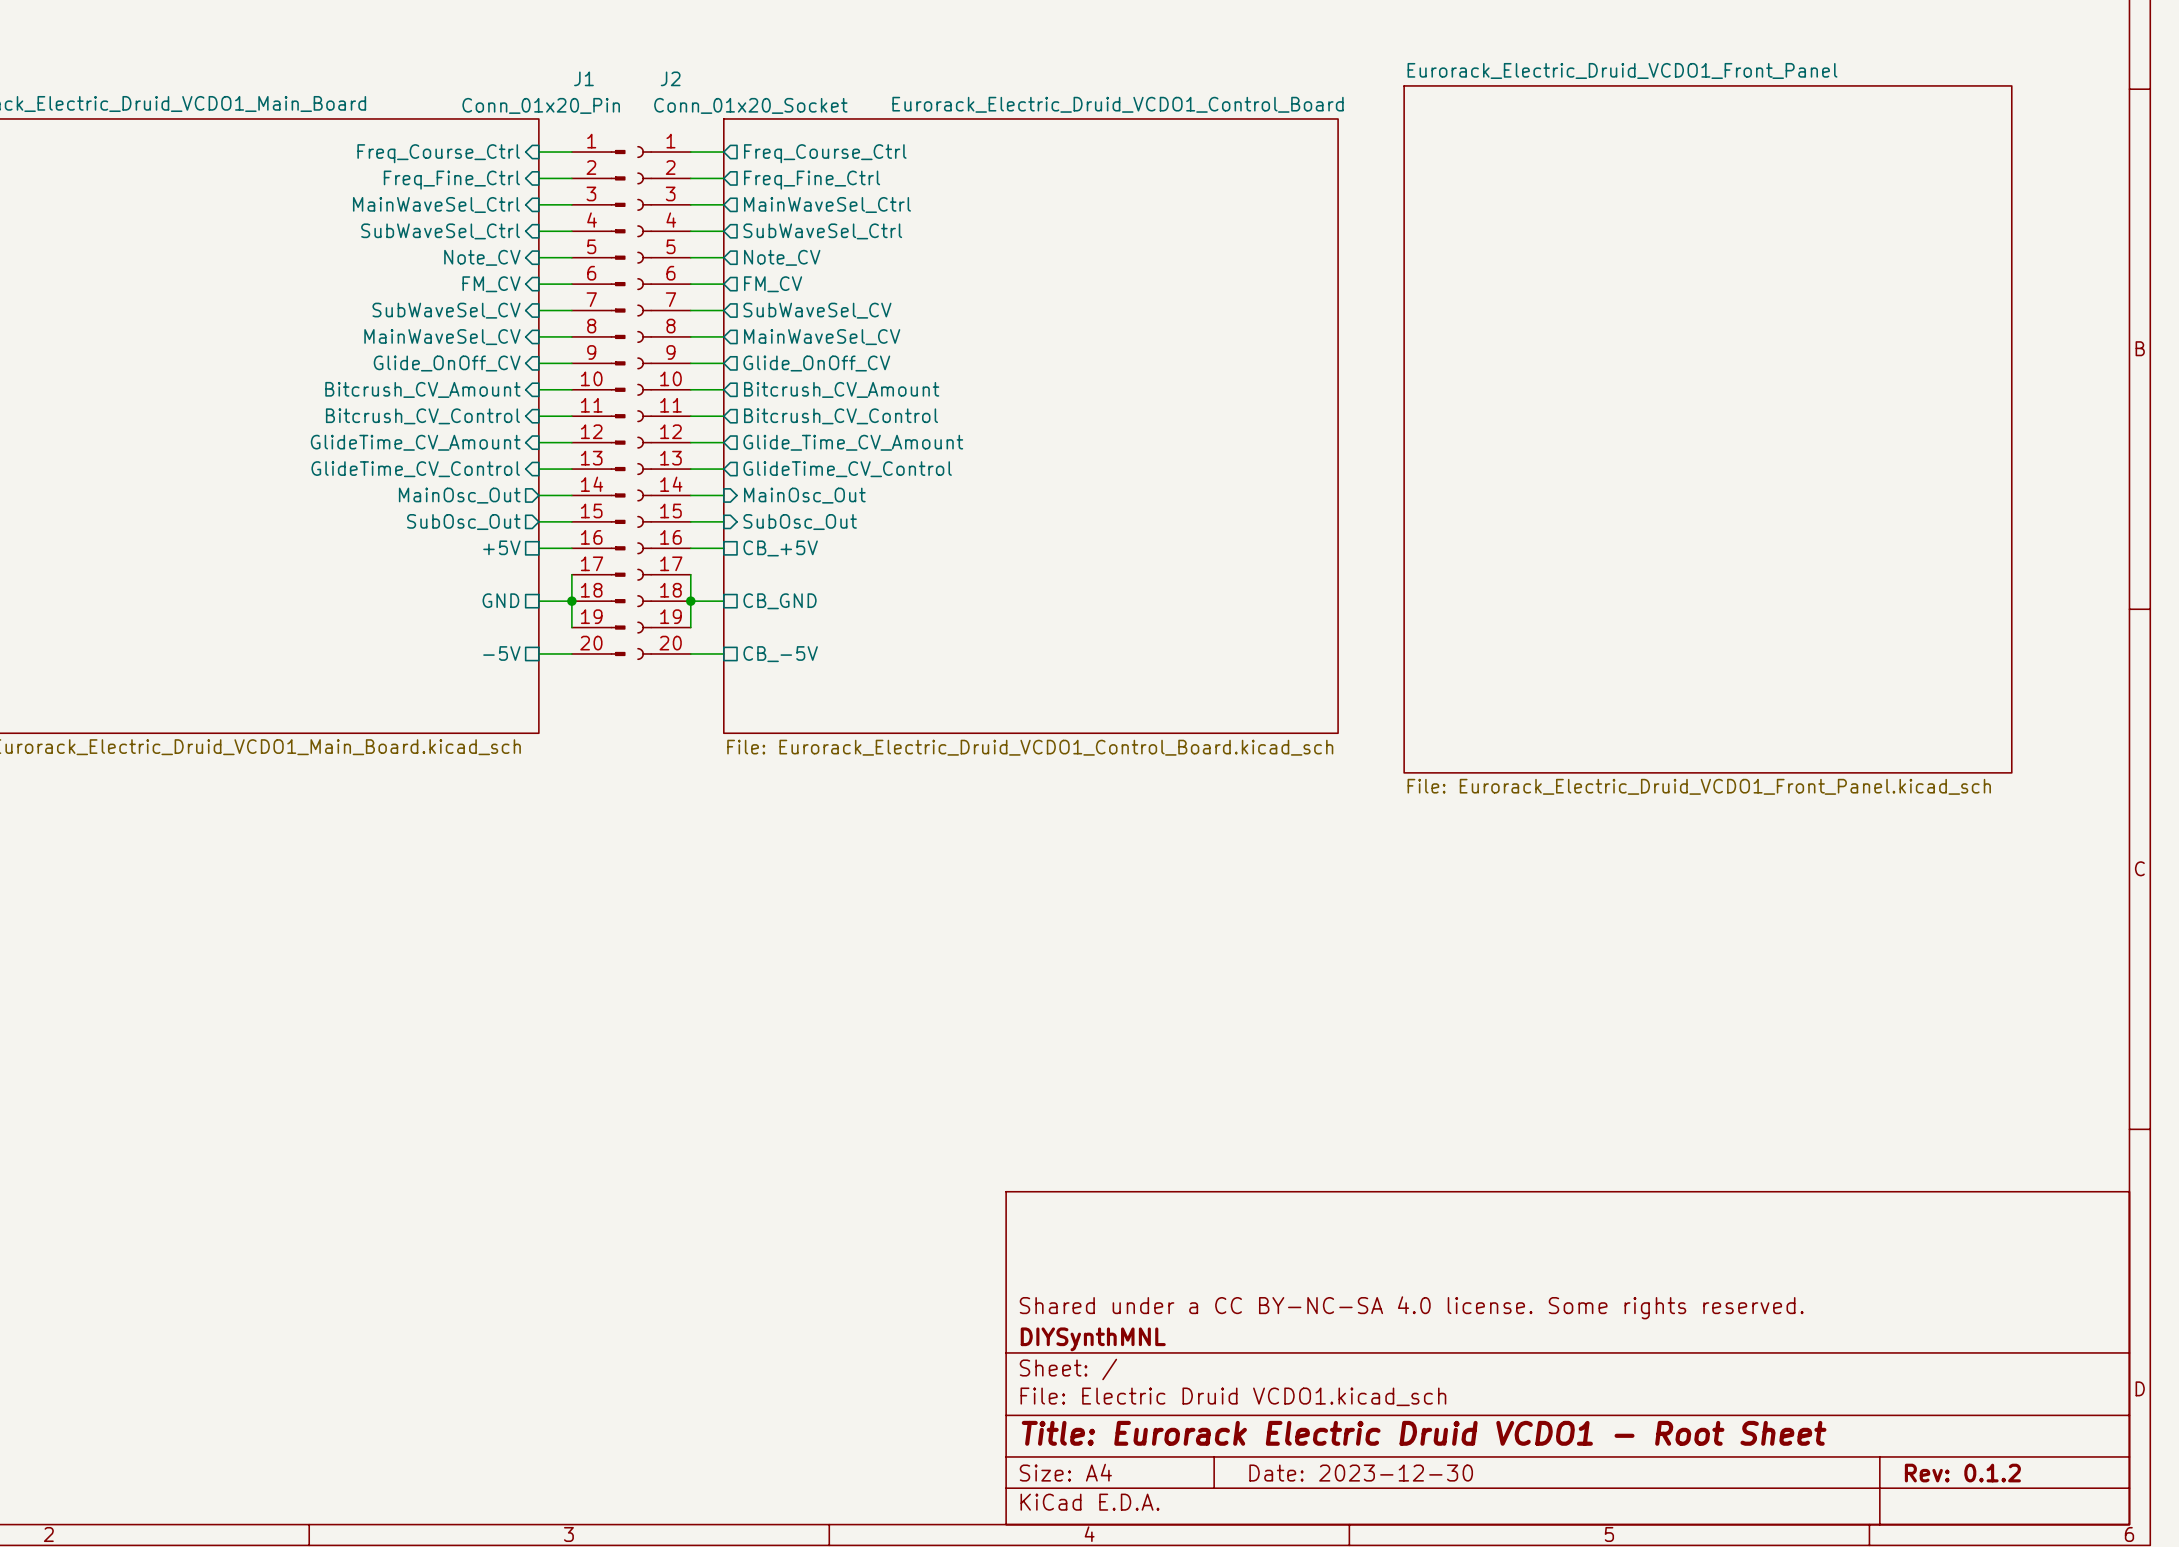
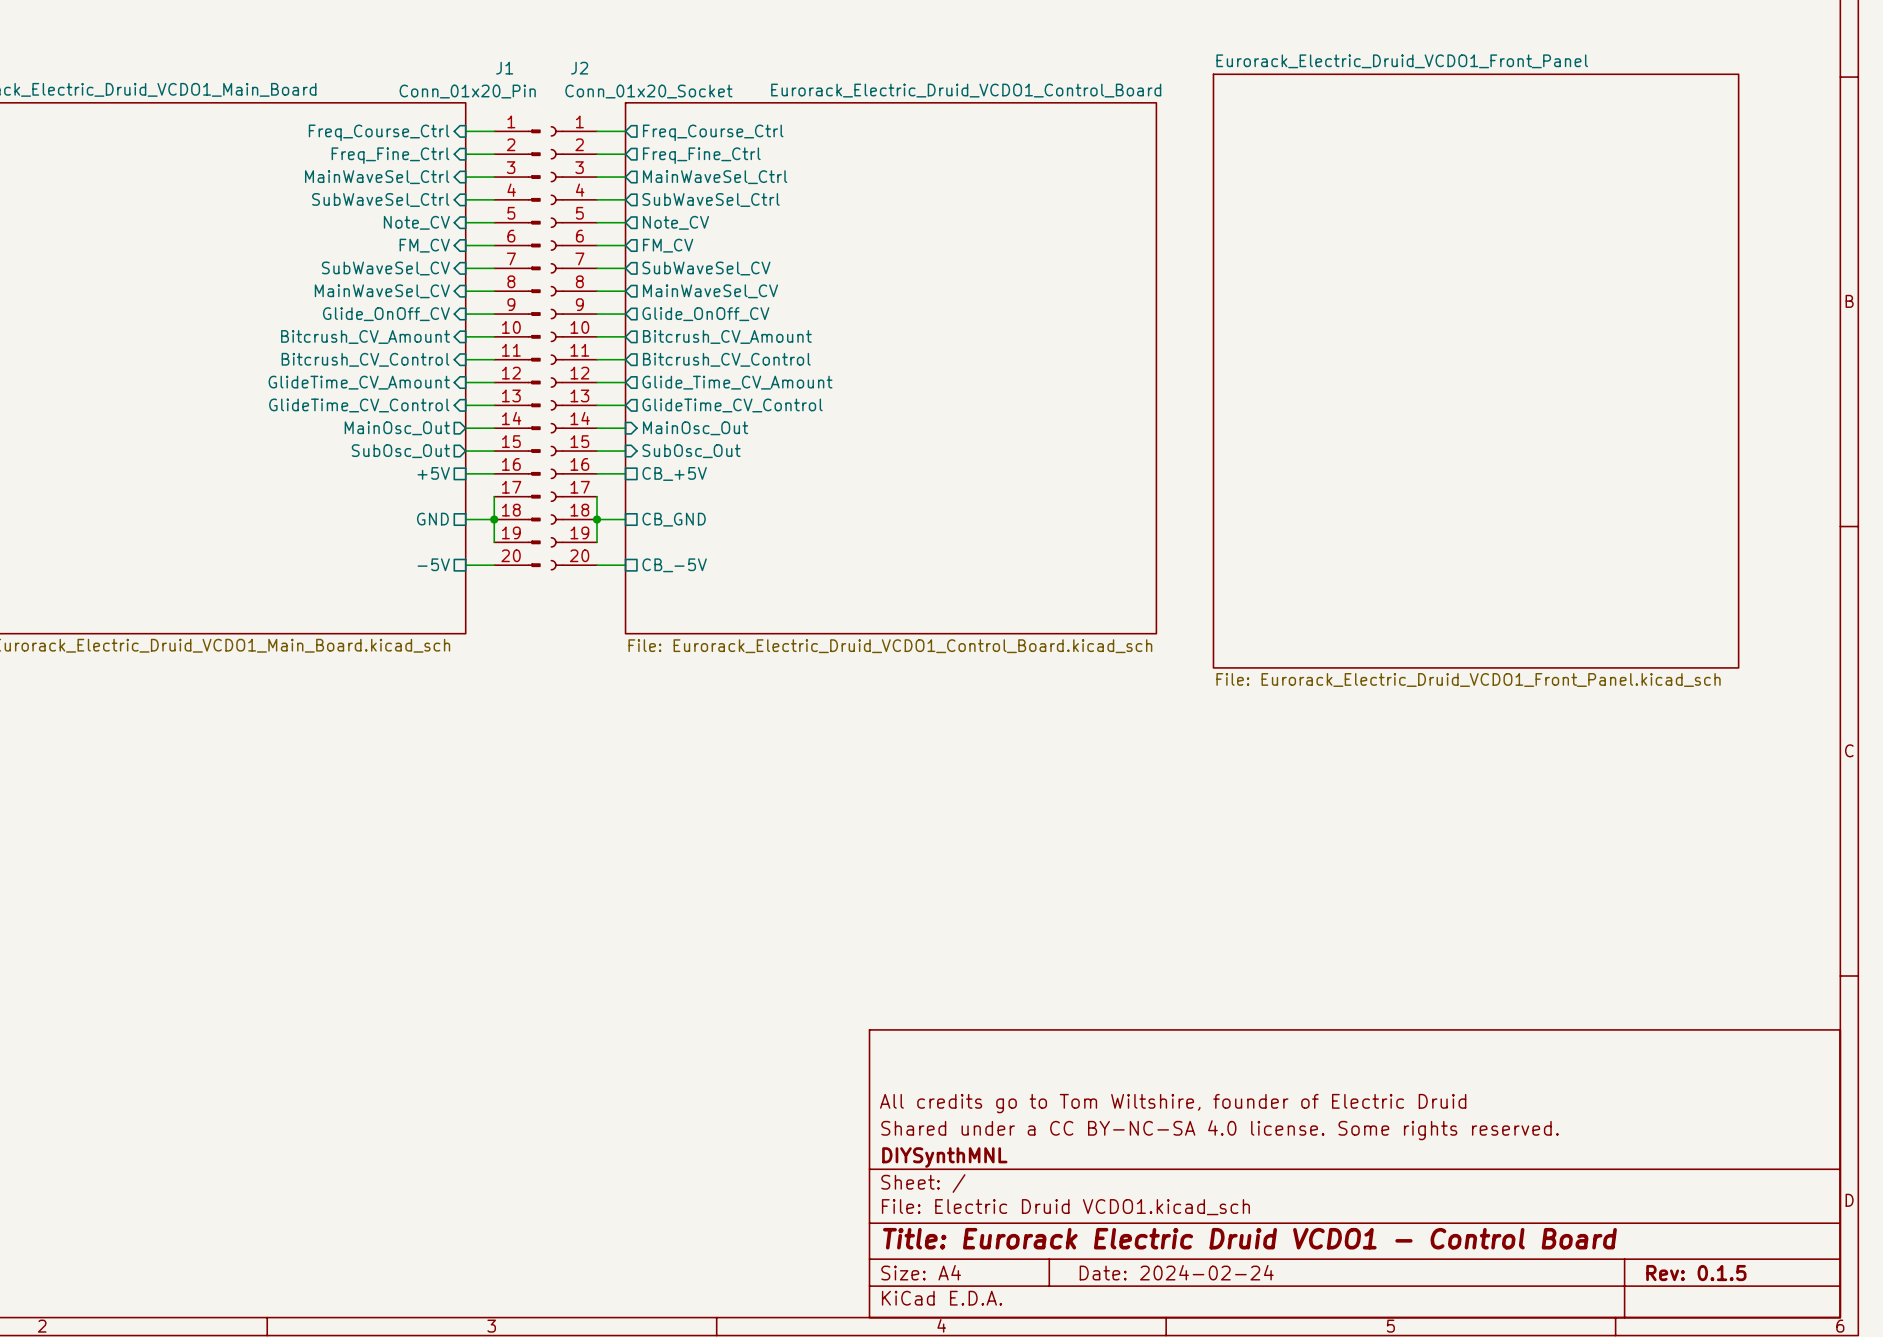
title block: none -> All credits go to Tom Wiltshire, founder of Electric Druid (1173, 1103)
title block: Title: Eurorack Electric Druid VCDO1 - Root Sheet (1424, 1433) -> Title: Eurorack Electric Druid VCDO1 - Control Board (1249, 1238)
title block: Date: 2023-12-30 (1361, 1473) -> Date: 2024-02-24 (1176, 1272)
title block: Rev: 0.1.2 (1962, 1473) -> Rev: 0.1.5 (1696, 1273)

